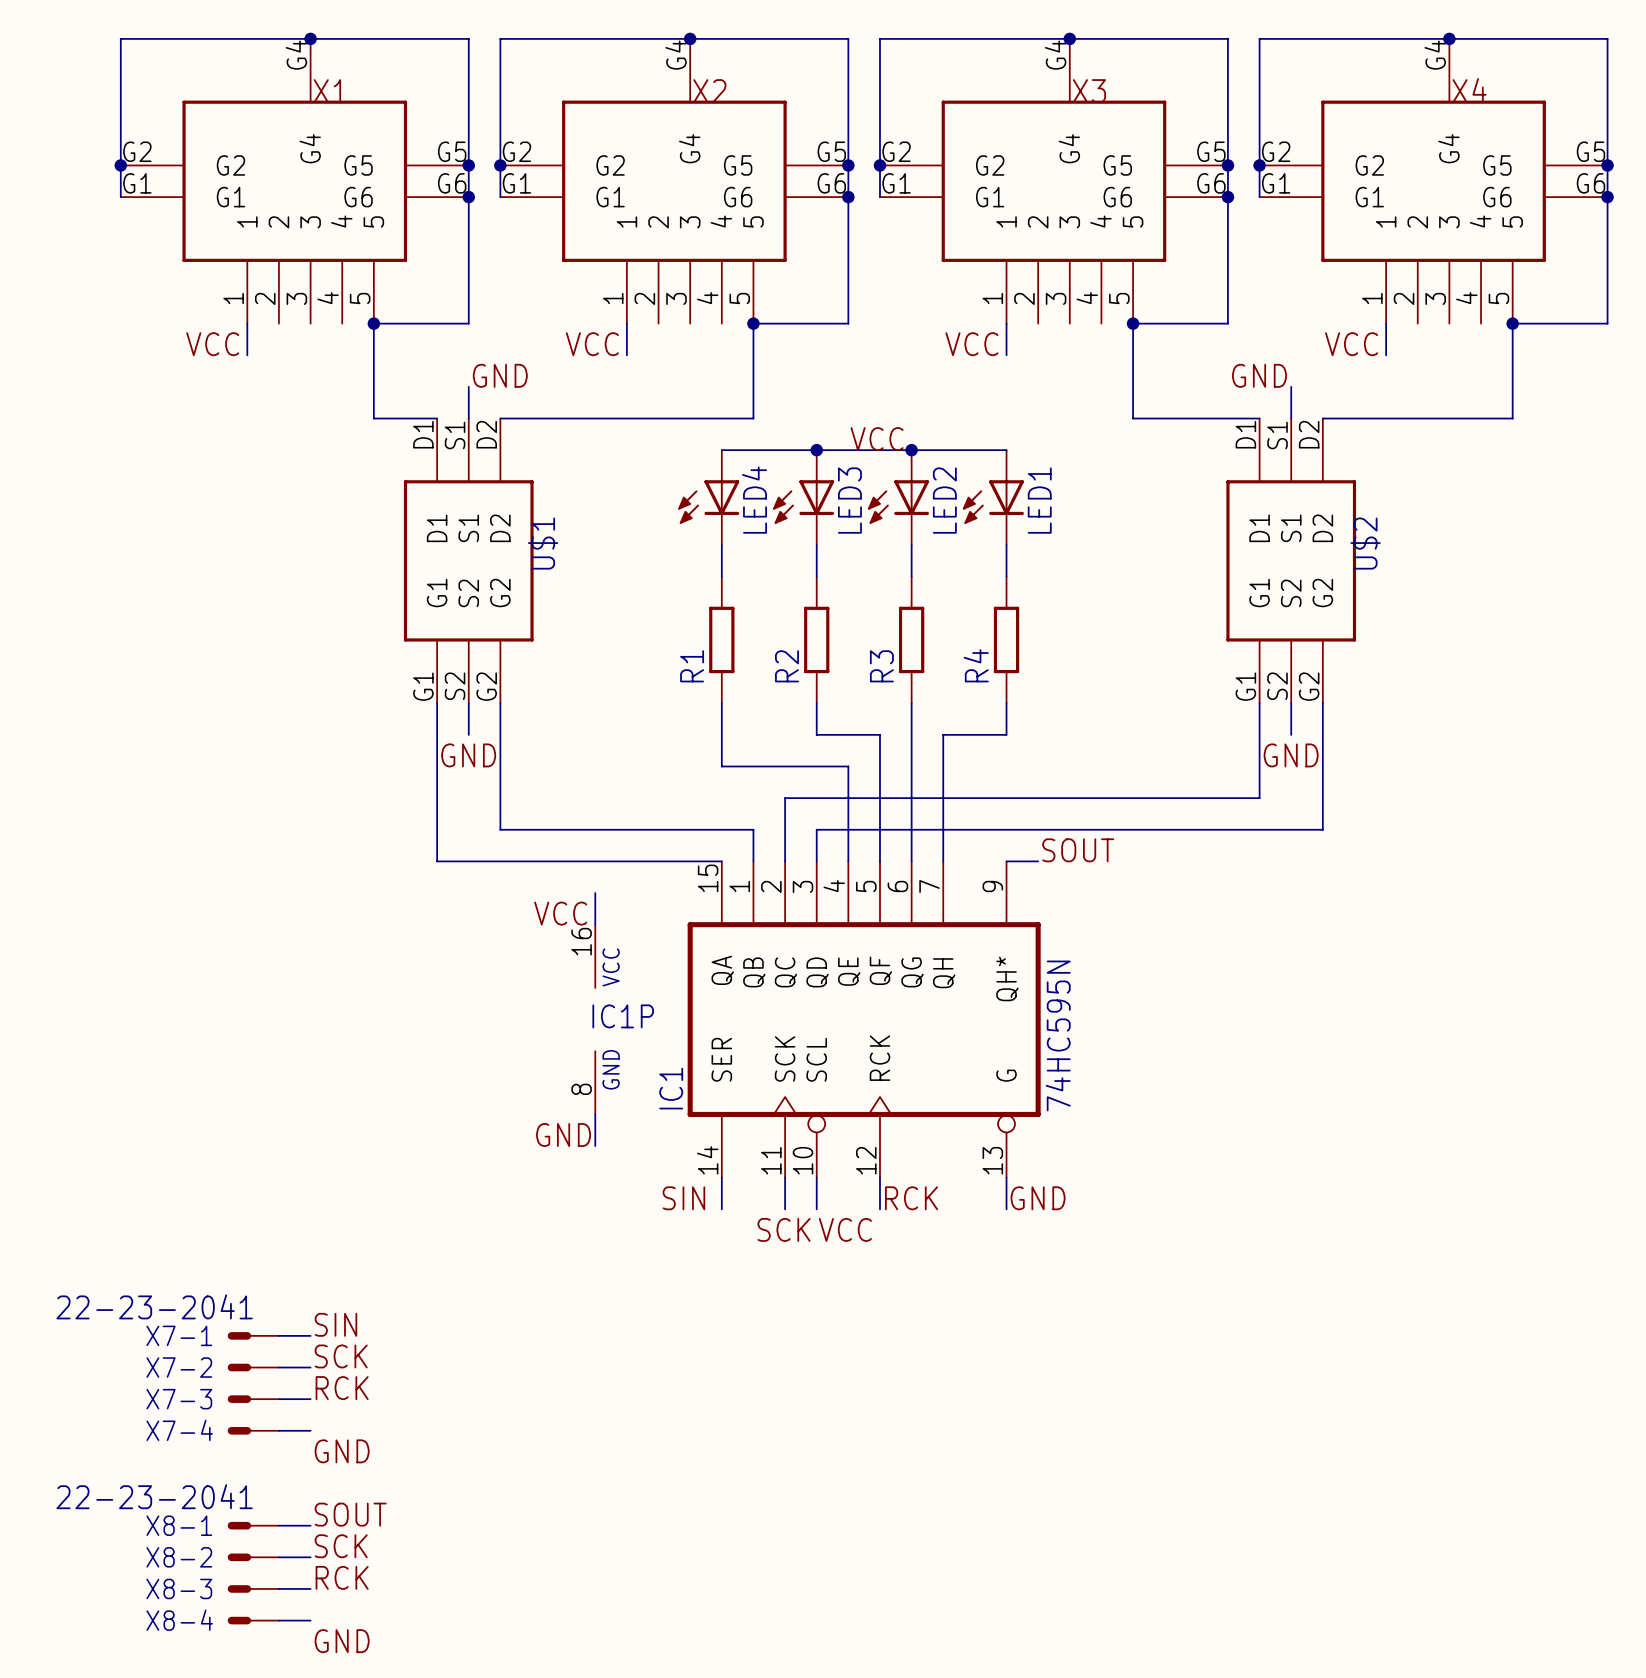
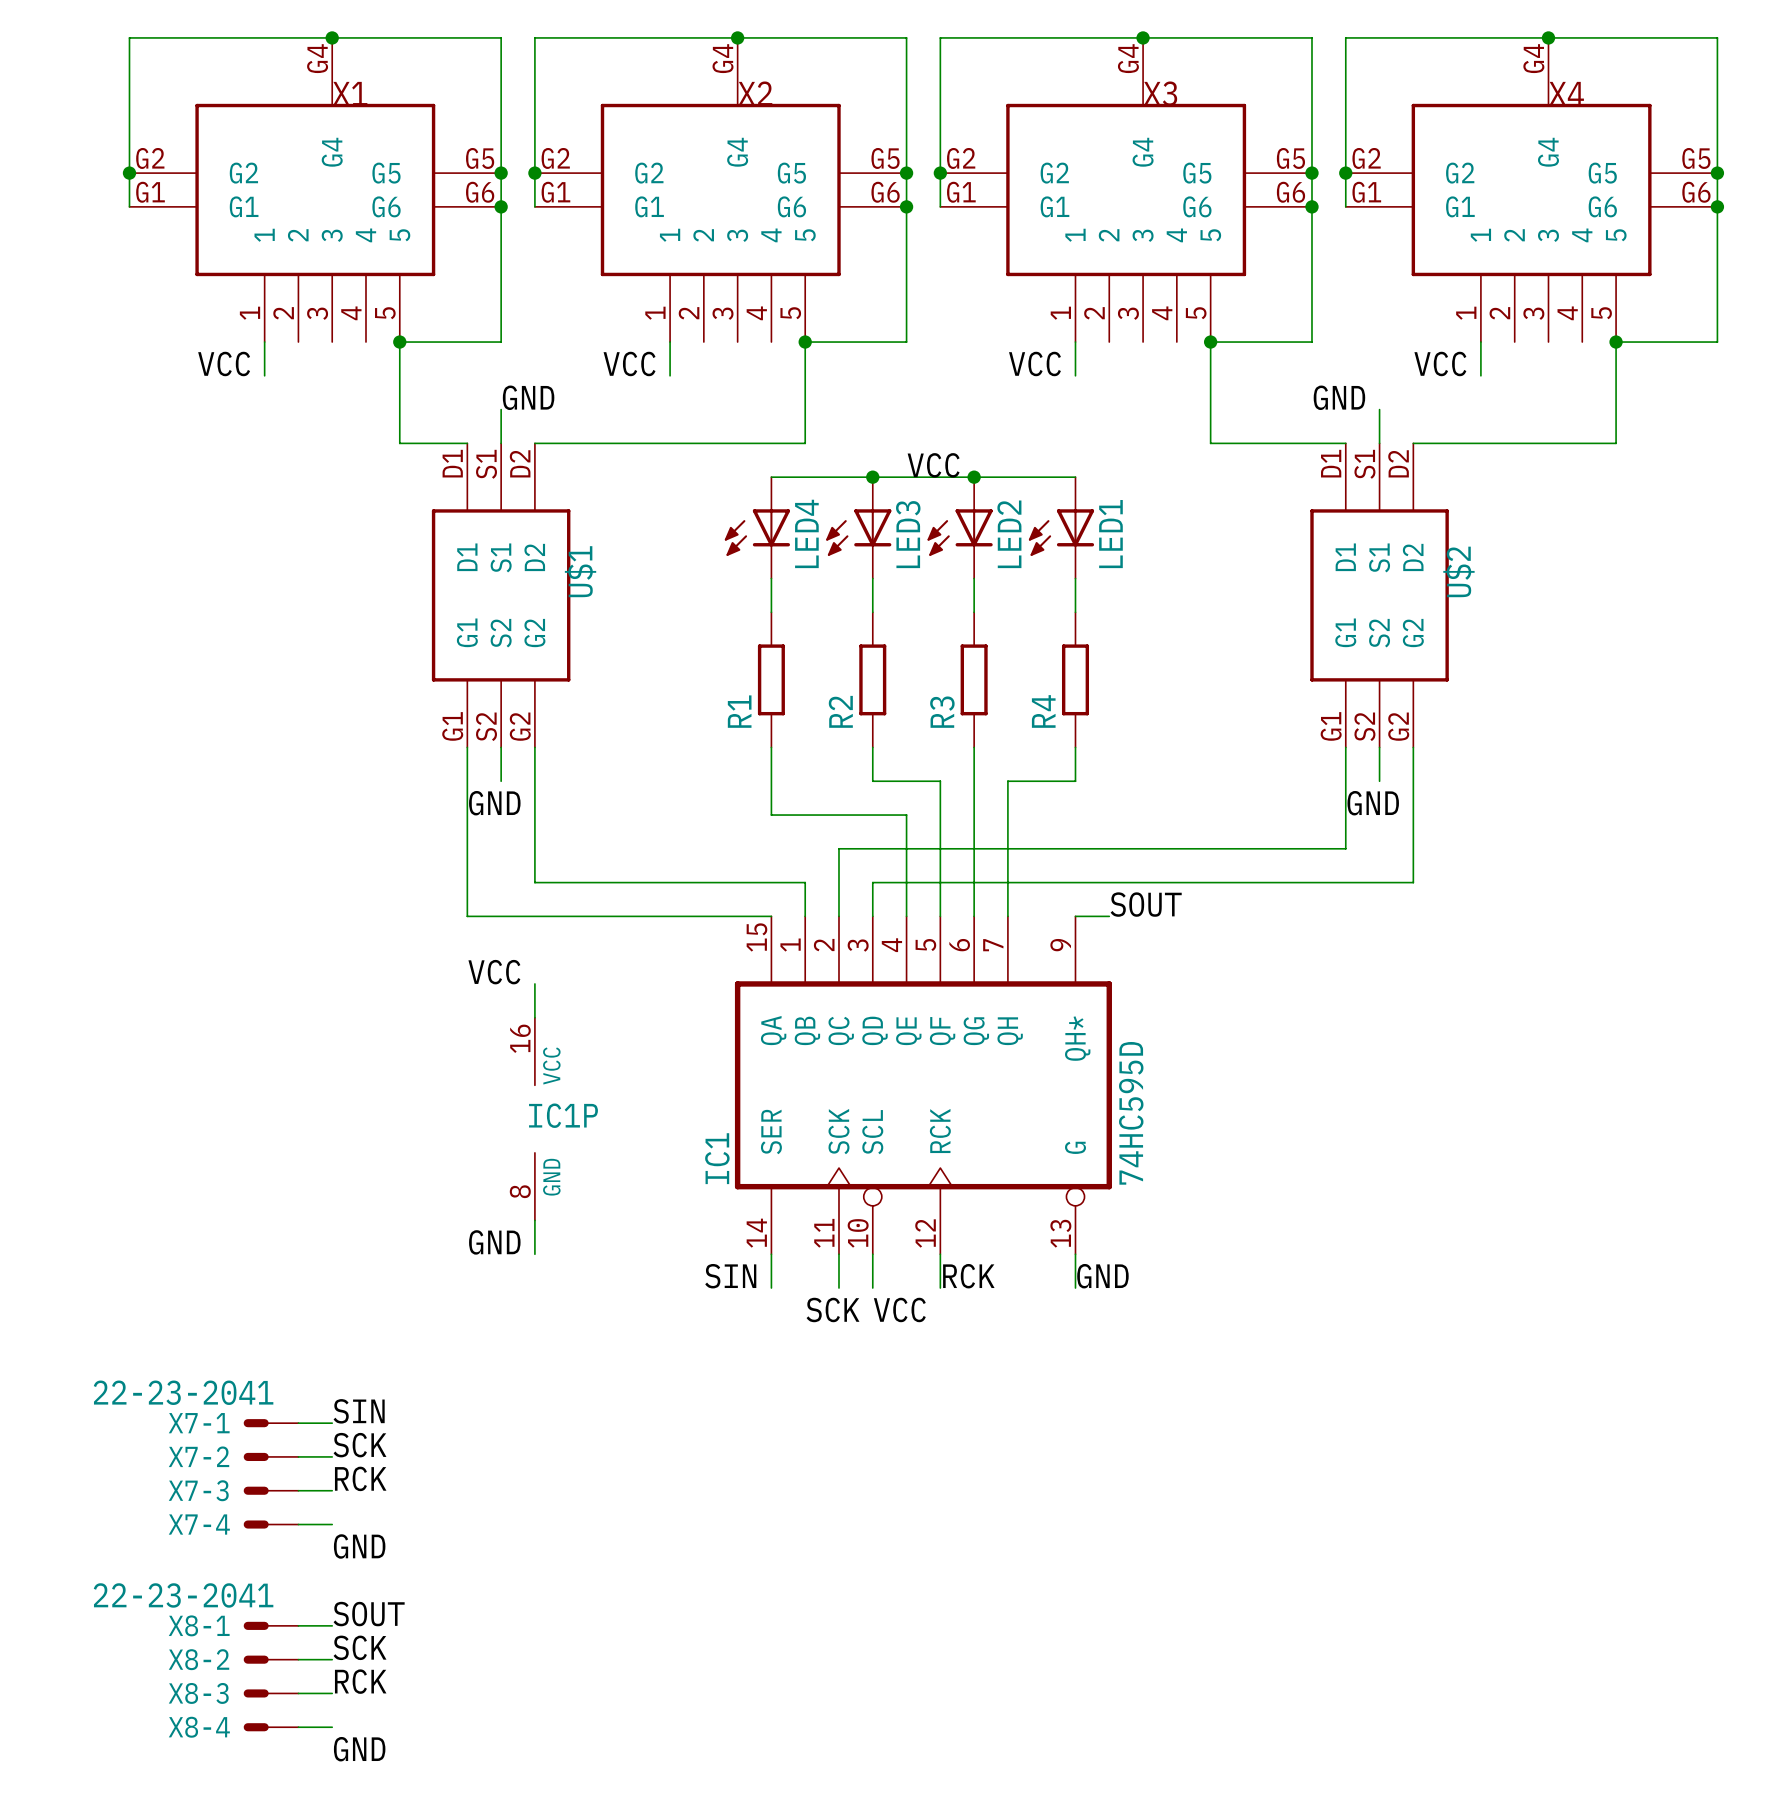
wire: (595, 893) (595, 924) -> (534, 983) (534, 1017)
label position: VCC (560, 913) -> VCC (494, 972)
IC1P position: (595, 1019) -> (534, 1119)
IC1 value: 74HC595N (1058, 1035) -> 74HC595D (1131, 1113)
wire: (595, 1114) (595, 1146) -> (534, 1220) (534, 1254)
label position: GND (563, 1135) -> GND (494, 1242)

